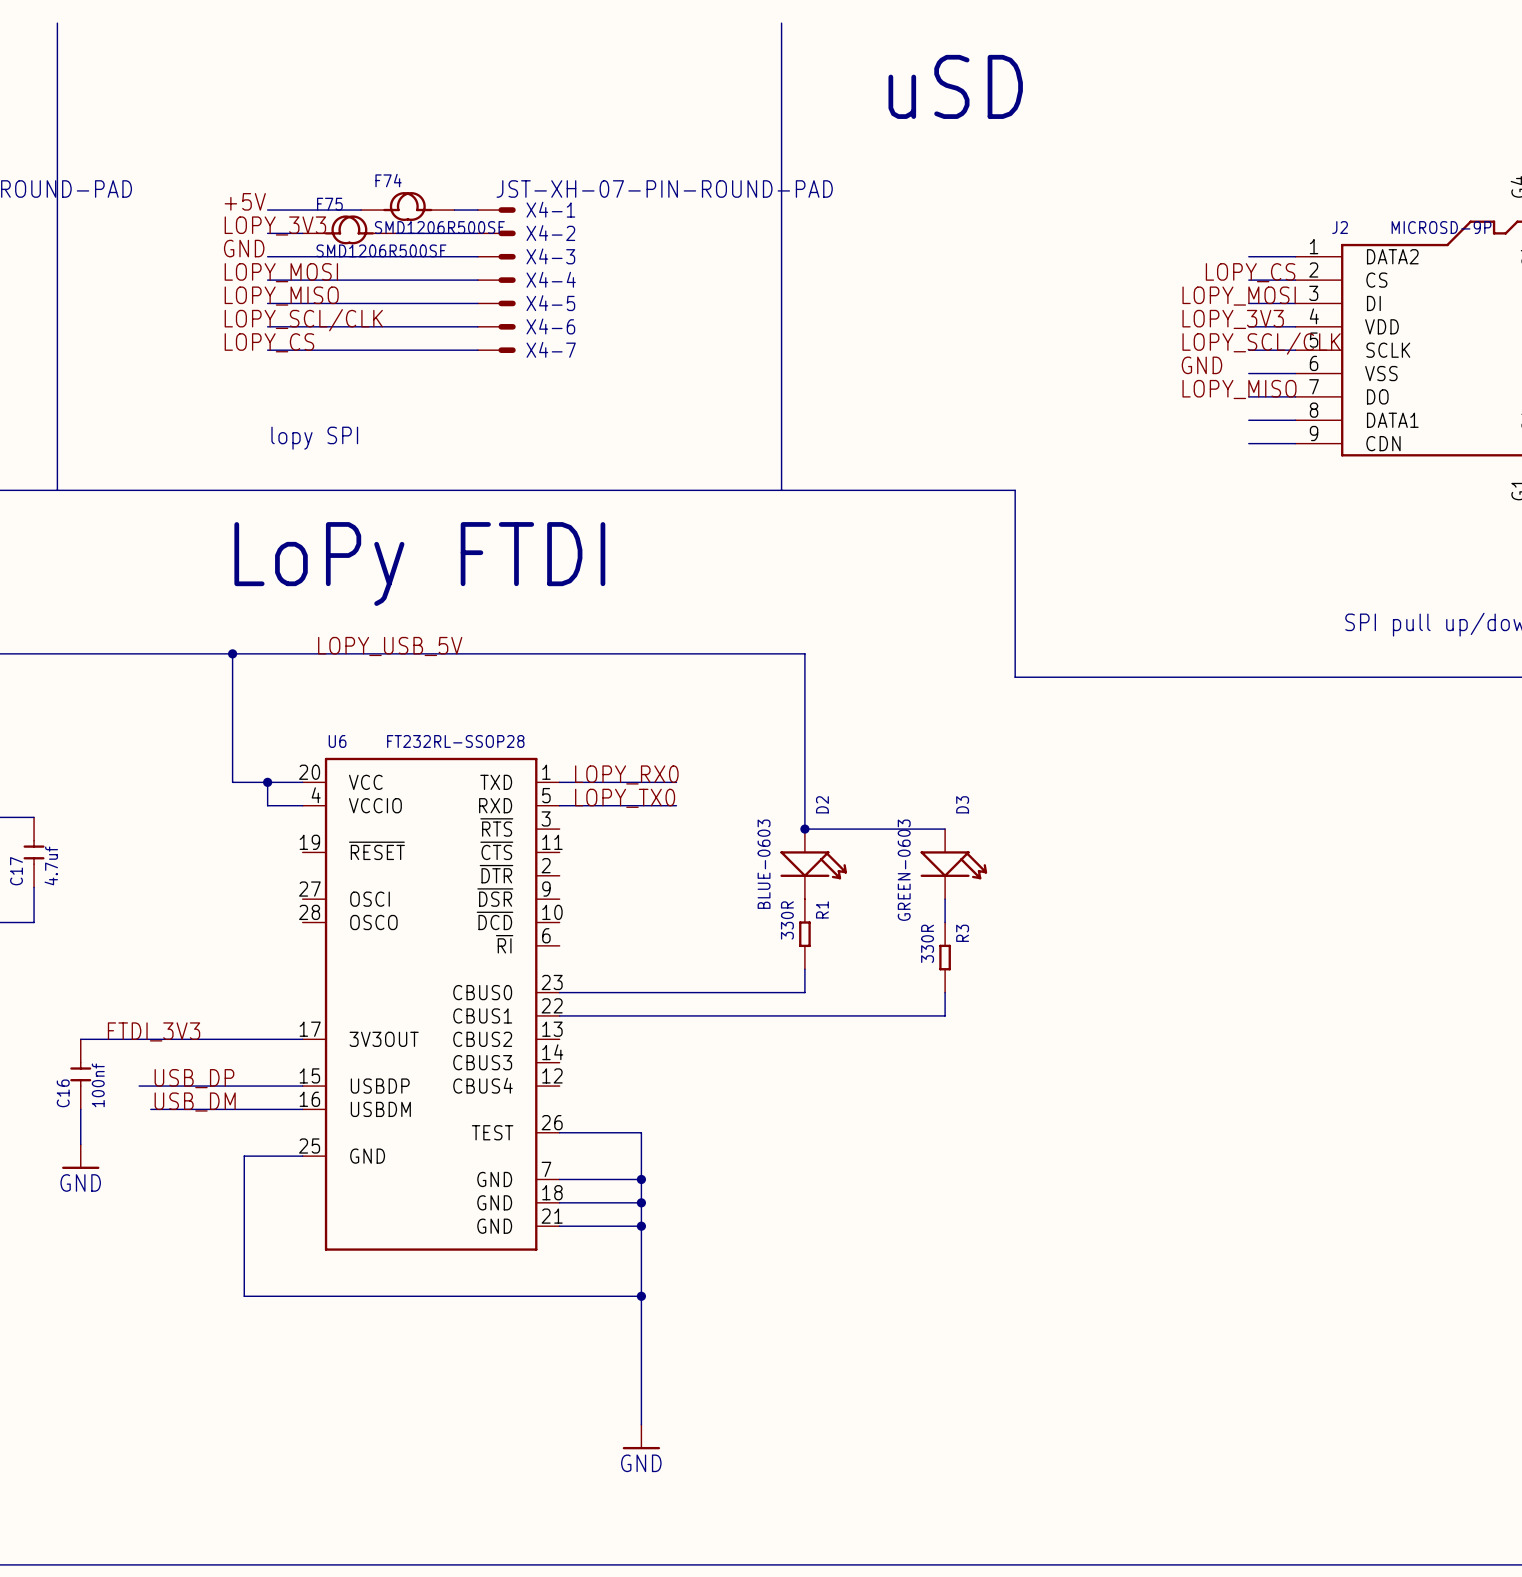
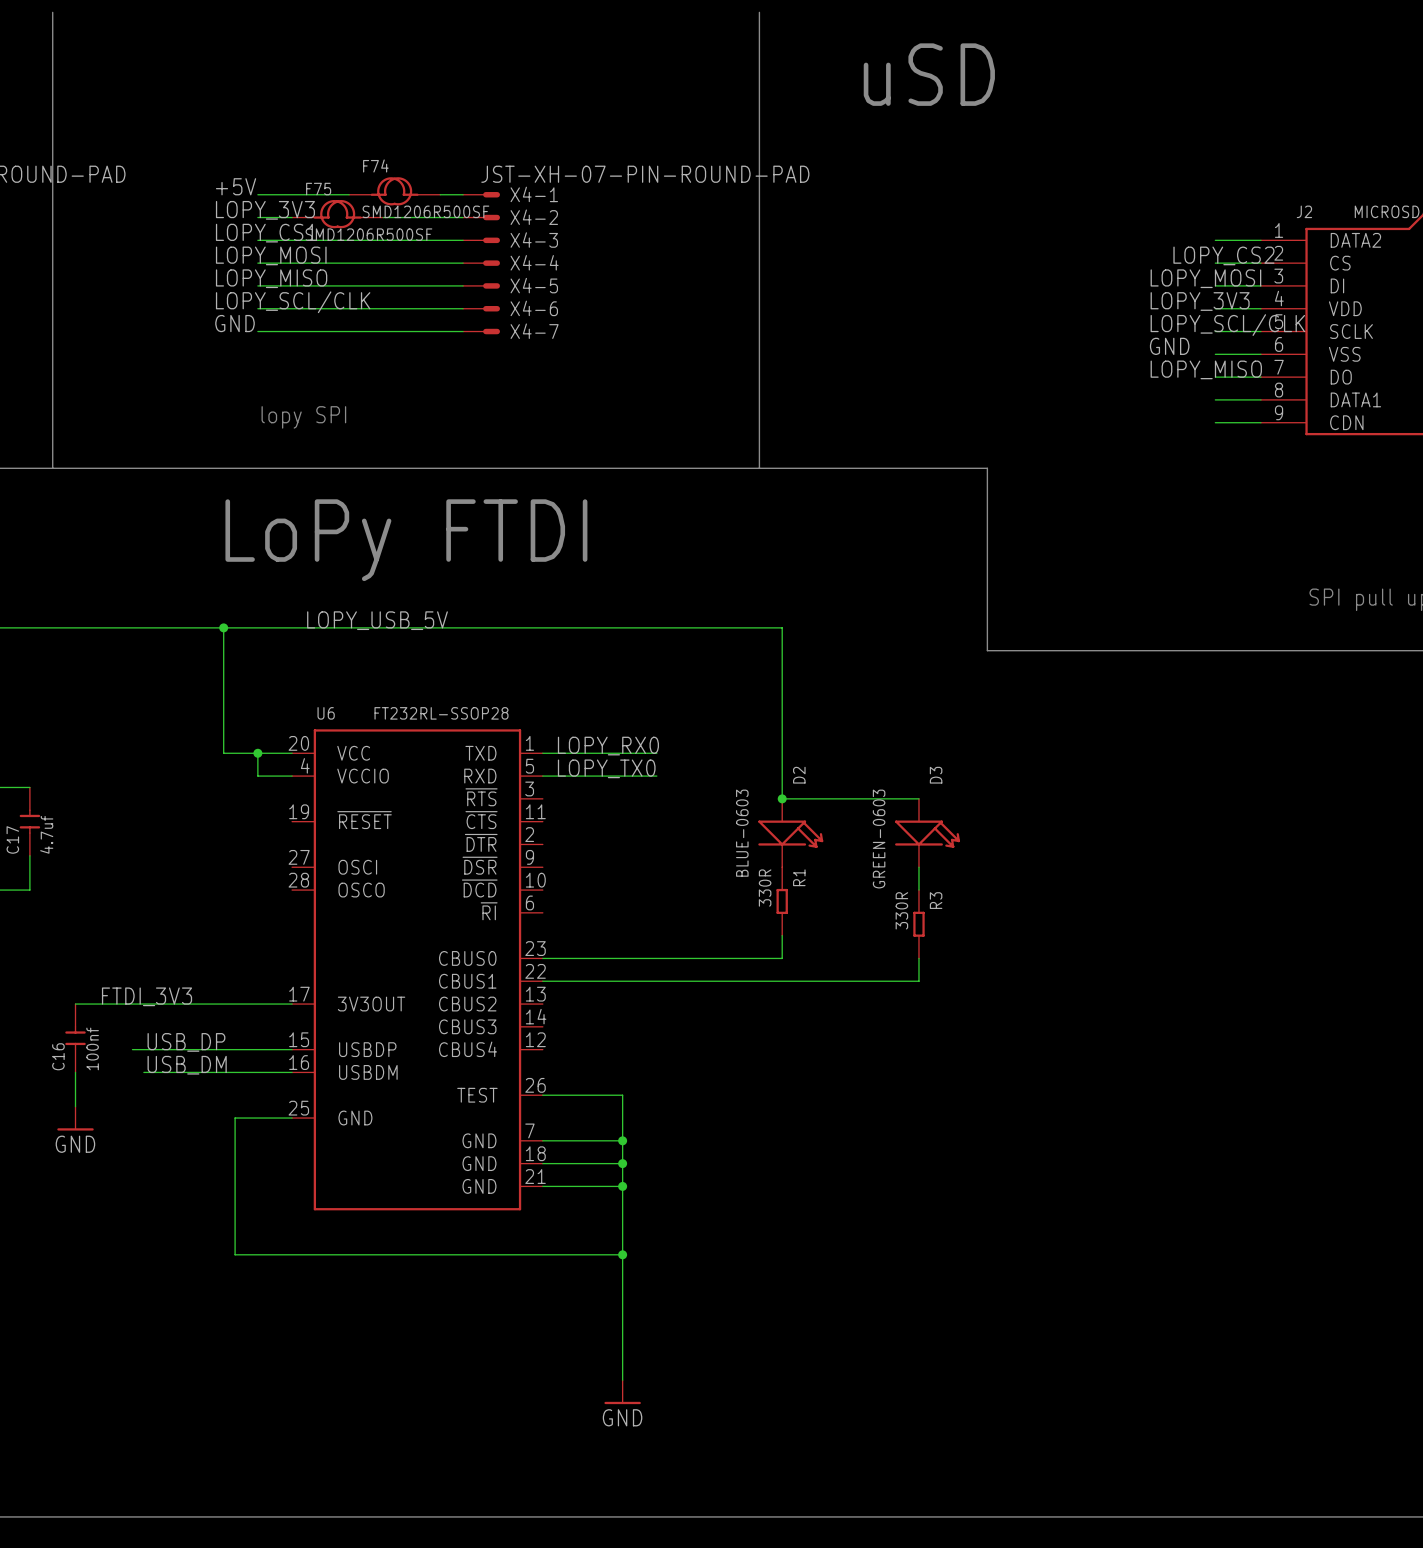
label: GND (244, 248) -> LOPY_CS1 (266, 233)
label: LOPY_CS (1250, 272) -> LOPY_CS2 (1223, 255)
label: LOPY_CS (269, 342) -> GND (235, 323)

